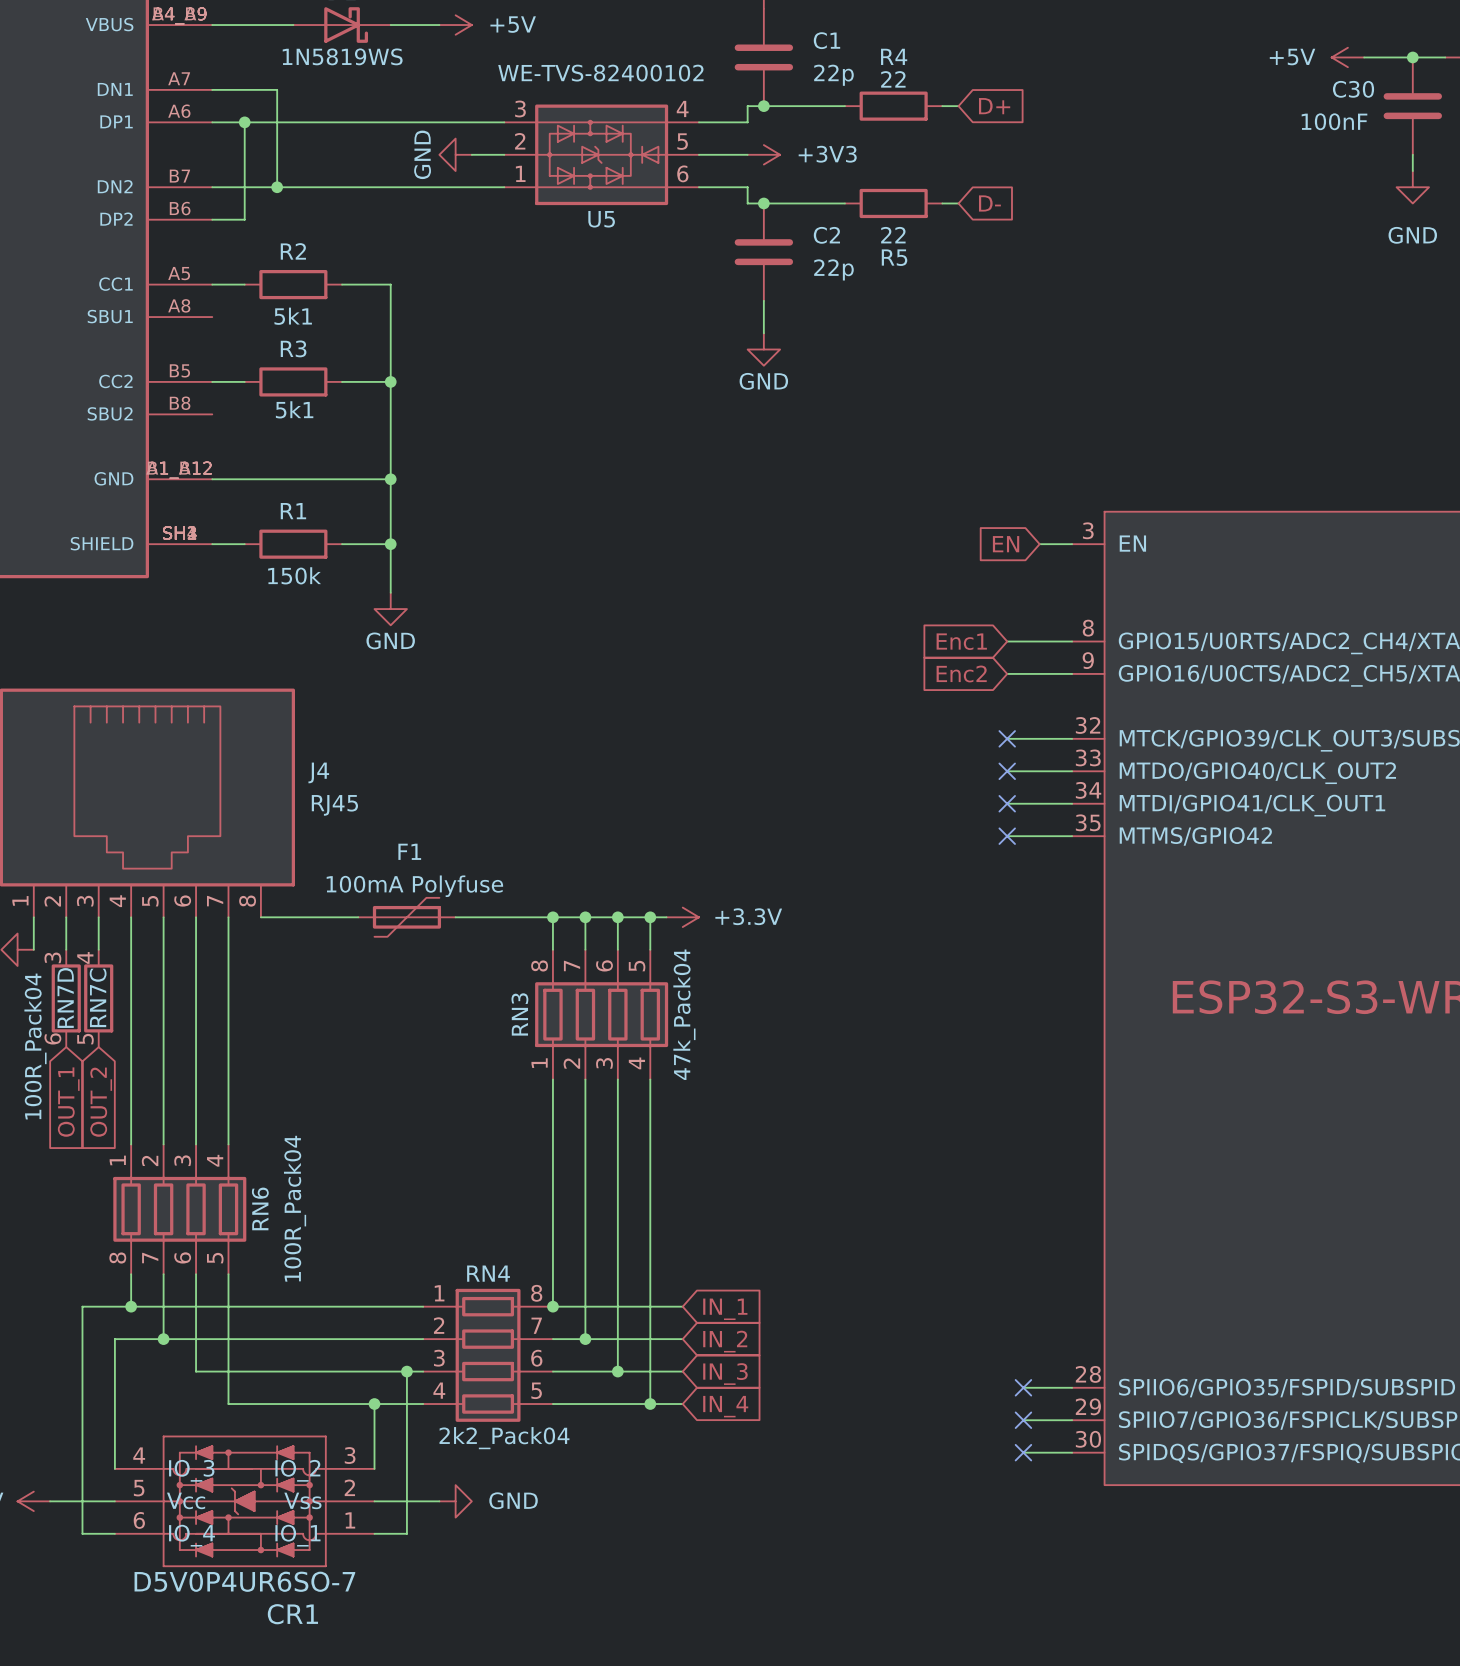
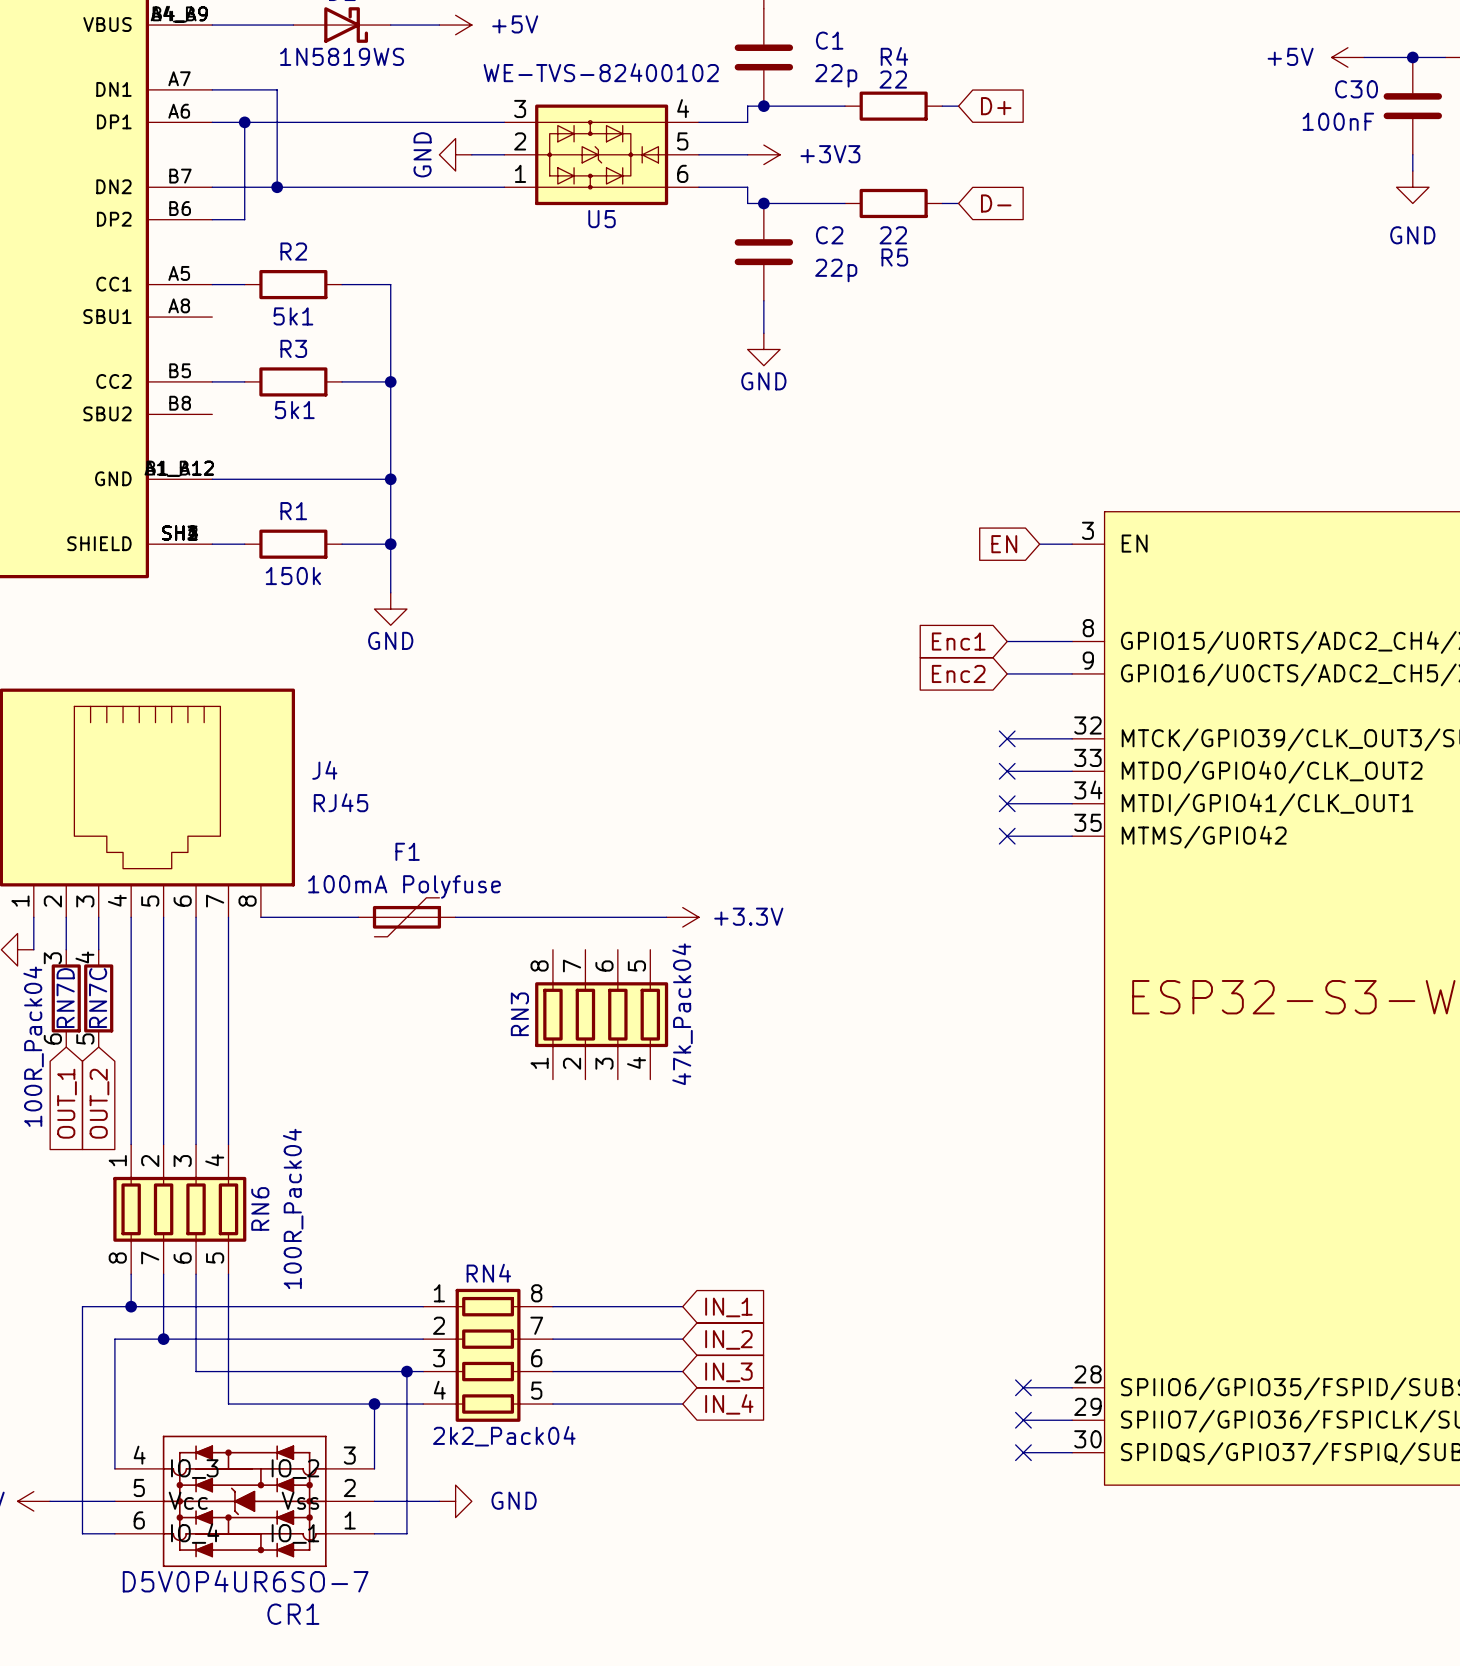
wire: (552, 917) (552, 949) -> none
junction: (552, 917) -> none
wire: (585, 917) (585, 949) -> none
junction: (585, 917) -> none
wire: (617, 917) (617, 949) -> none
junction: (617, 917) -> none
wire: (650, 917) (650, 949) -> none
junction: (650, 917) -> none
wire: (552, 1079) (552, 1306) -> none
wire: (585, 1079) (585, 1339) -> none
wire: (617, 1079) (617, 1371) -> none
wire: (650, 1079) (650, 1404) -> none
junction: (552, 1306) -> none
junction: (585, 1339) -> none
junction: (617, 1371) -> none
junction: (650, 1404) -> none

